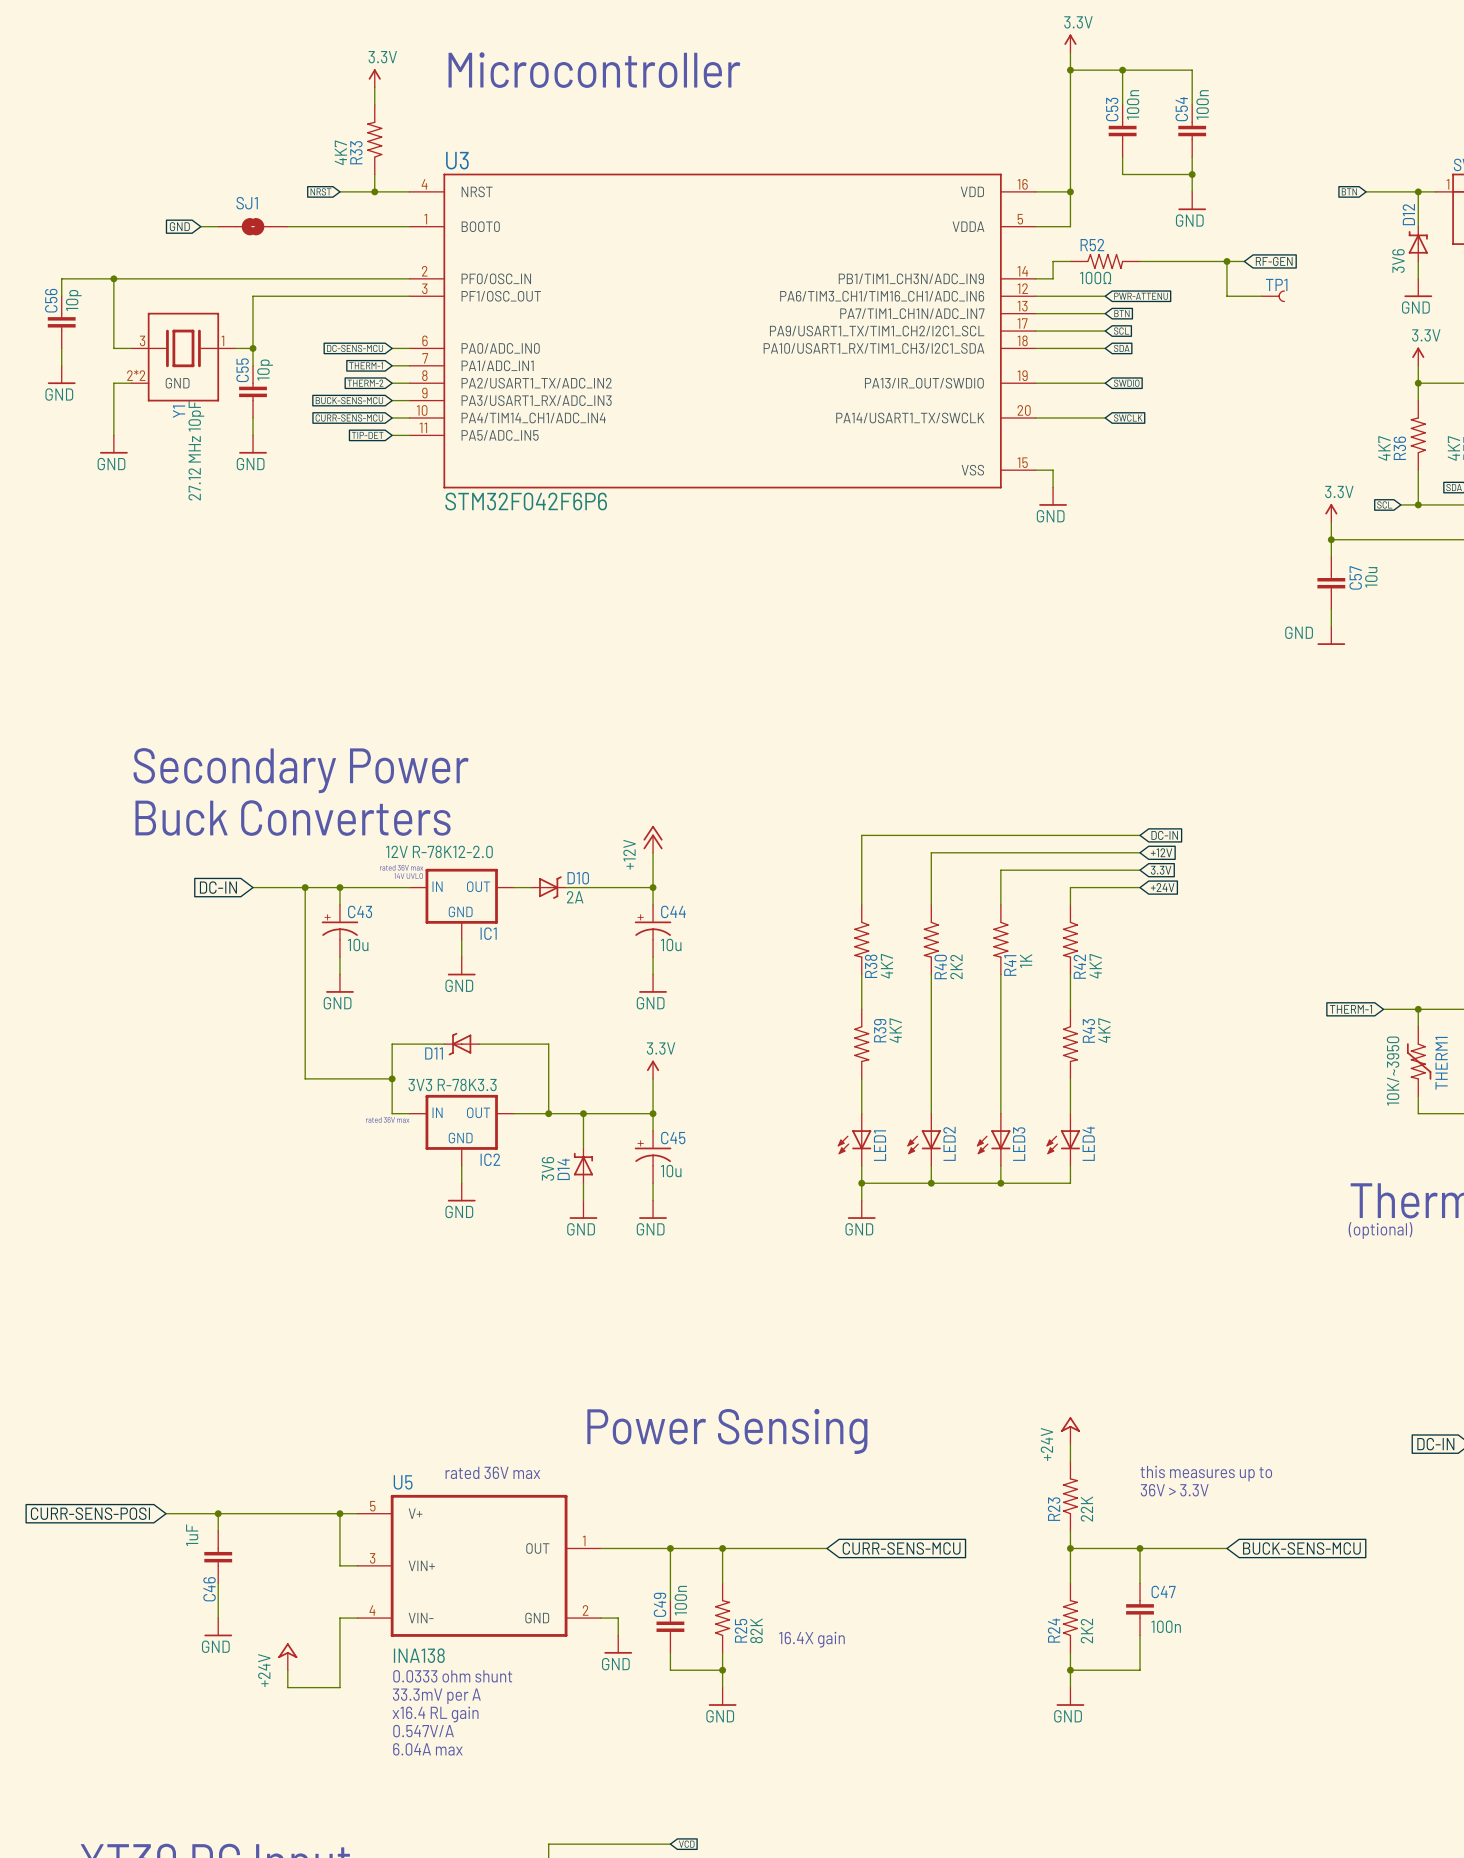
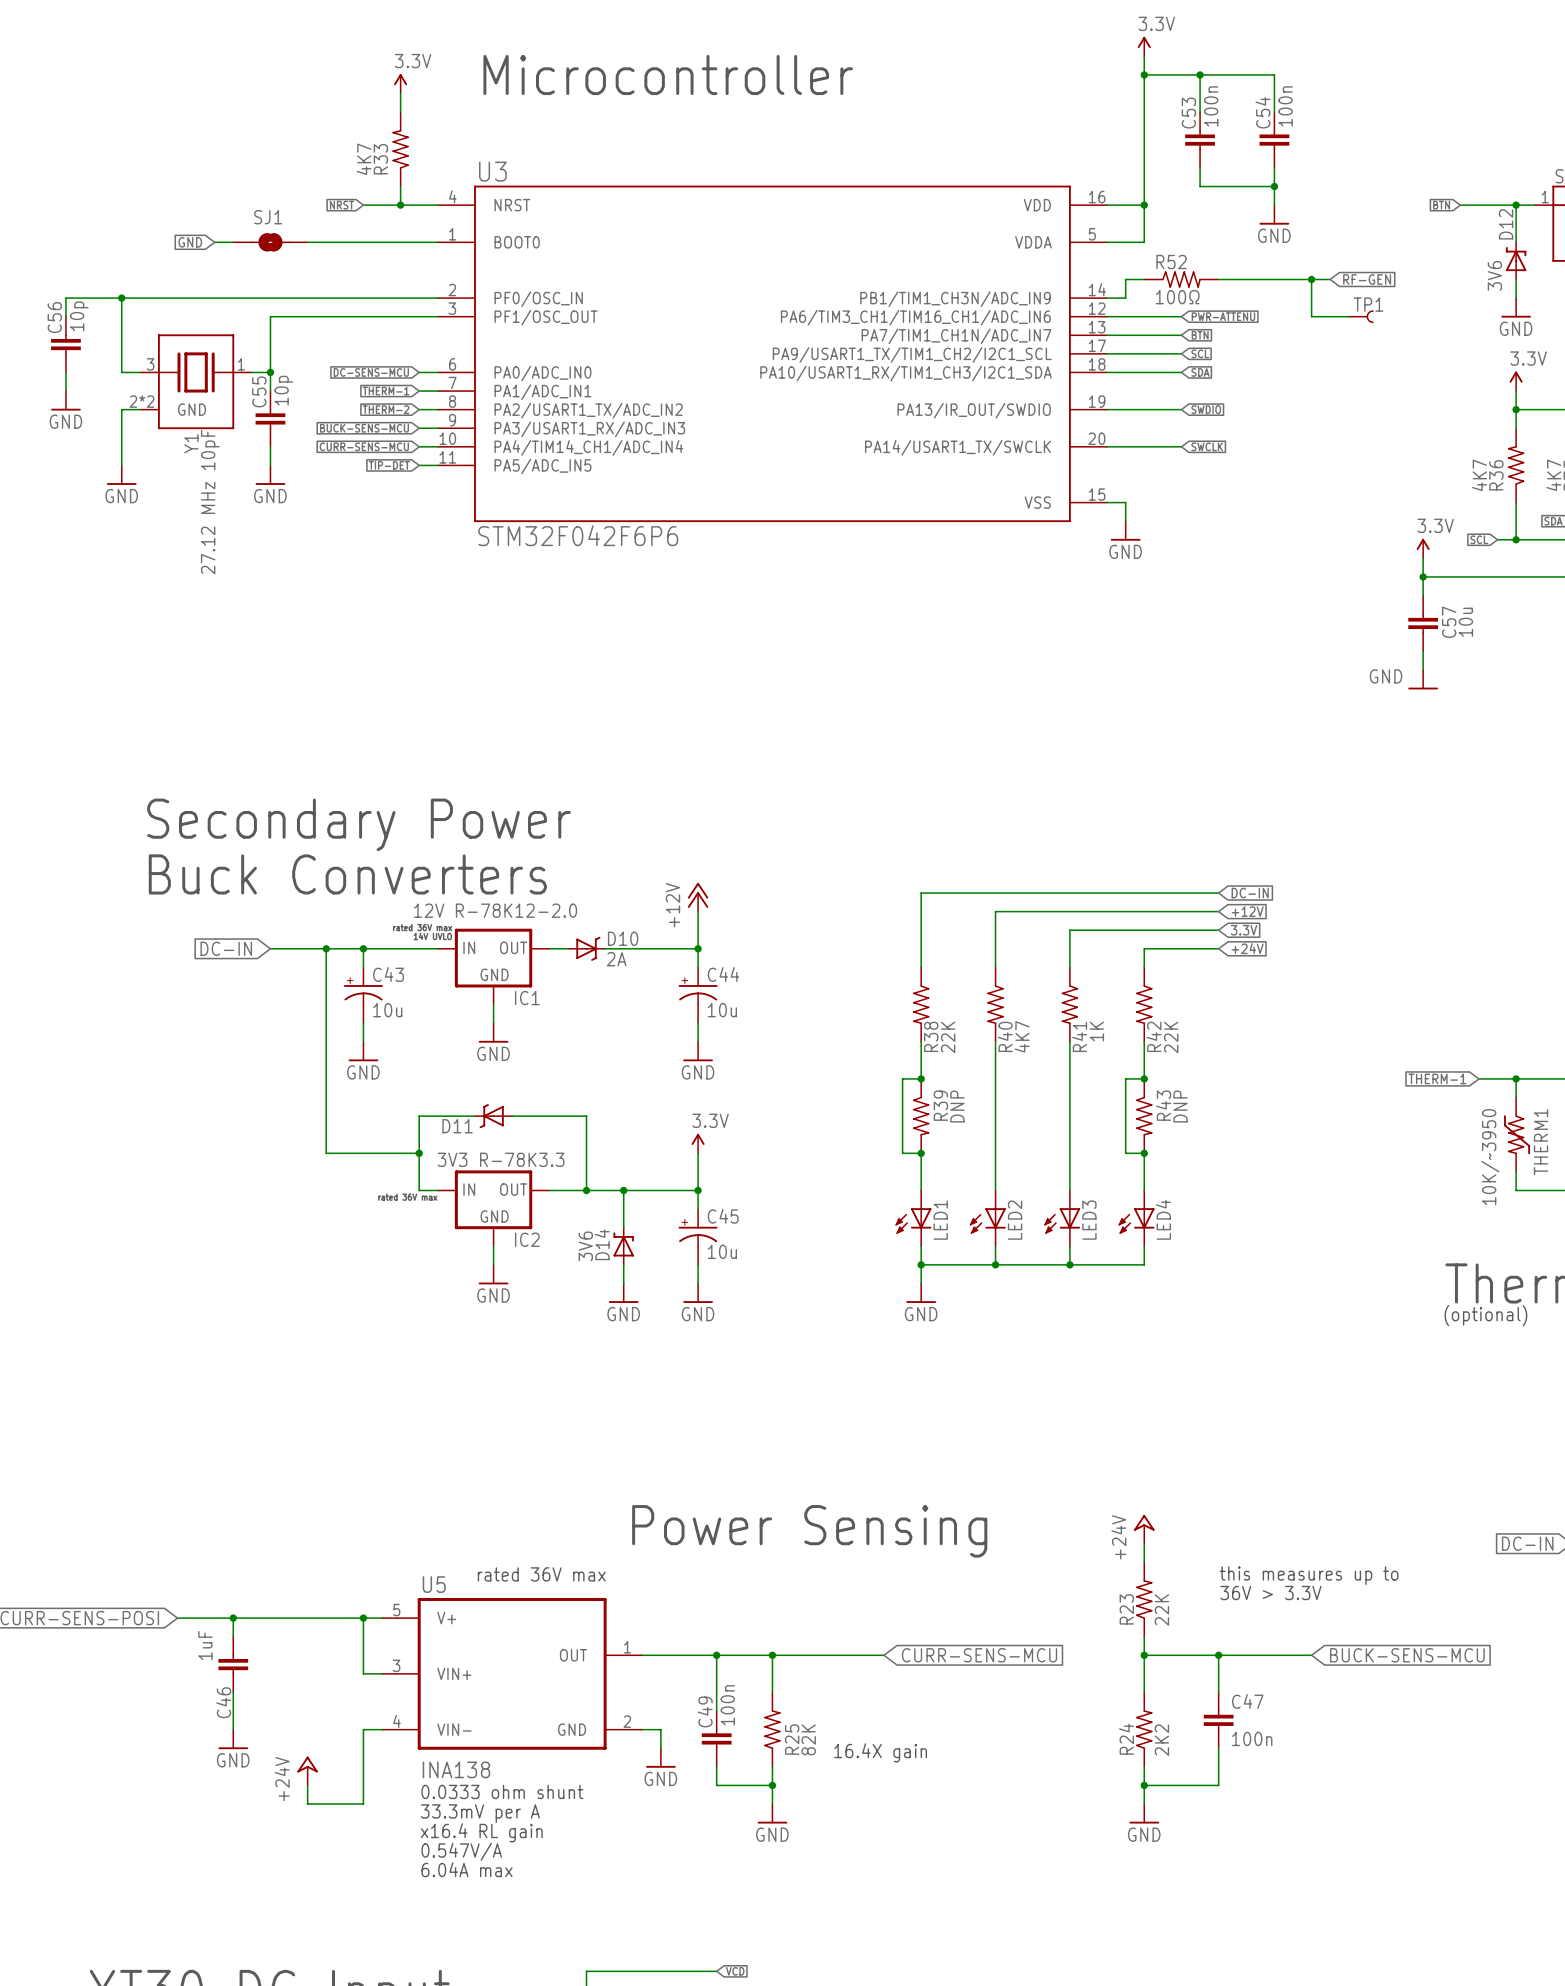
R38 value: 4K7 (886, 966) -> 22K (948, 1037)
R40 value: 2K2 (956, 966) -> 4K7 (1022, 1036)
R42 value: 4K7 (1095, 966) -> 22K (1171, 1037)
wire: none -> (921, 1078) (902, 1078) (902, 1153) (921, 1153)
junction: none -> (921, 1078)
wire: none -> (1144, 1078) (1125, 1078) (1125, 1153) (1144, 1153)
junction: none -> (1144, 1078)
R39 value: 4K7 (895, 1030) -> DNP (957, 1106)
R43 value: 4K7 (1104, 1030) -> DNP (1180, 1106)
junction: none -> (921, 1153)
junction: none -> (1144, 1153)

